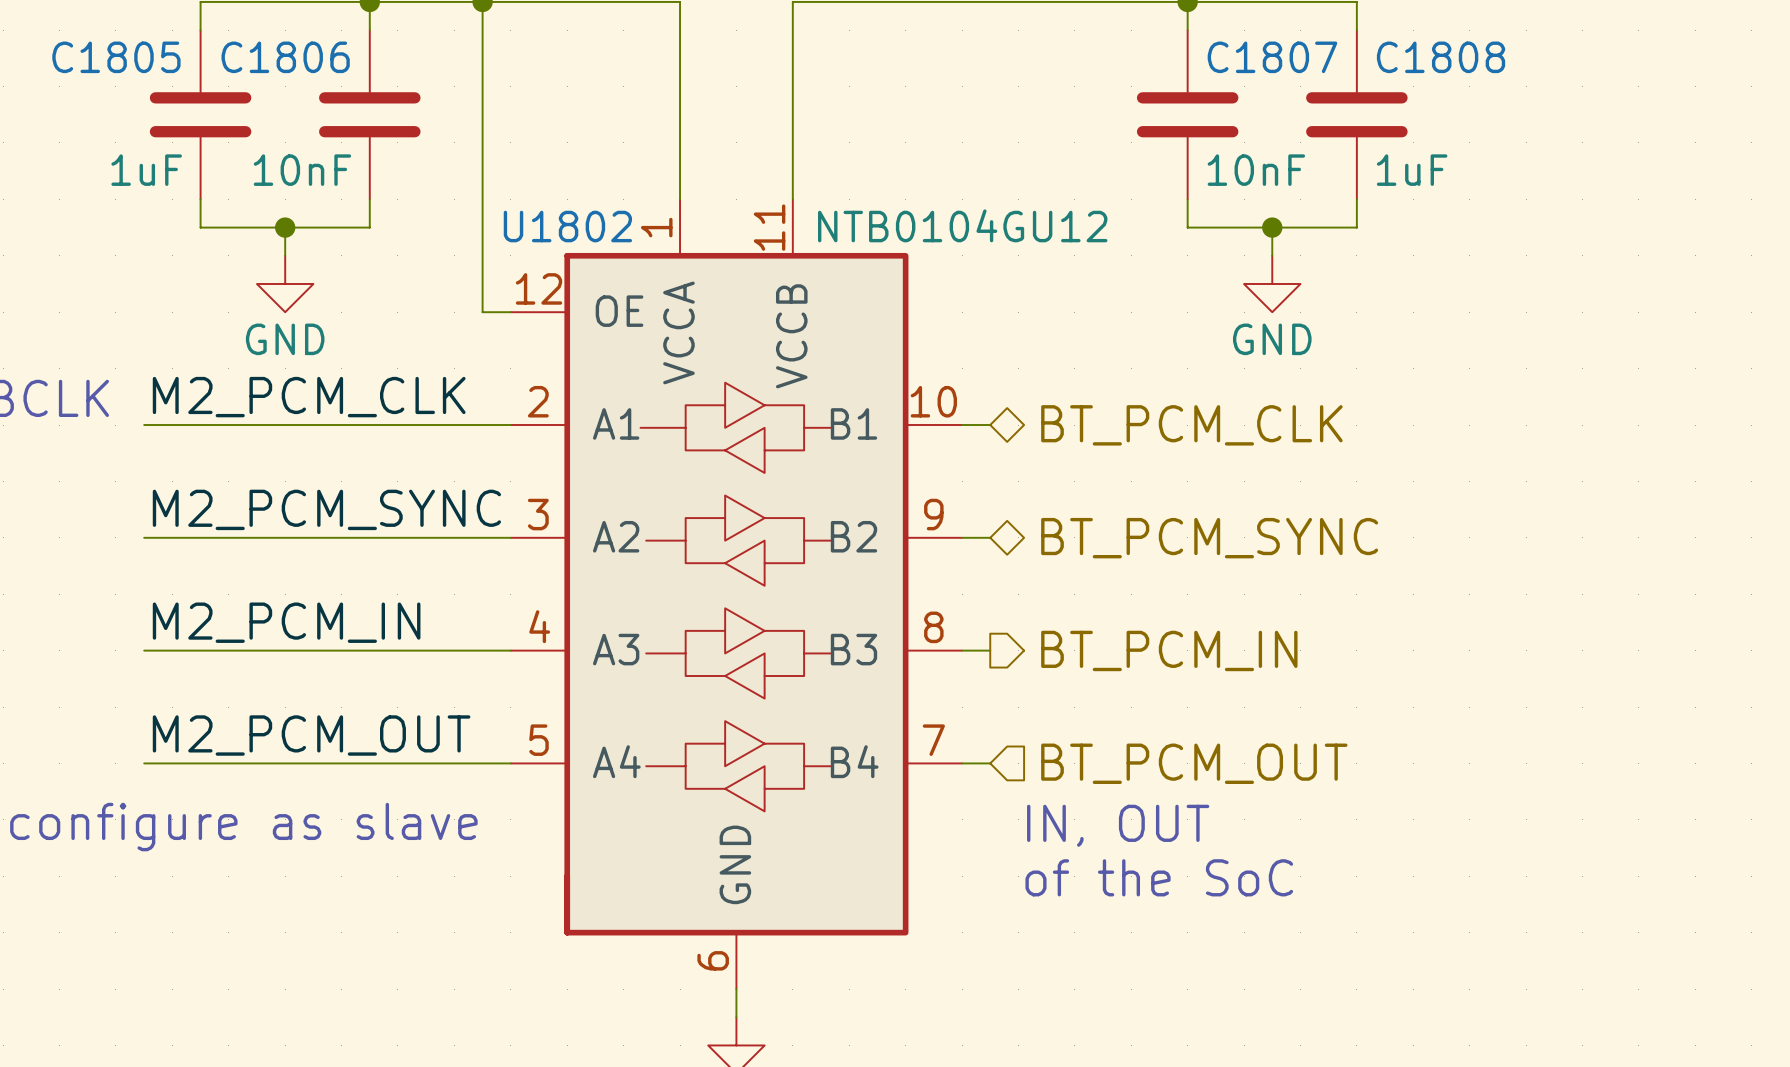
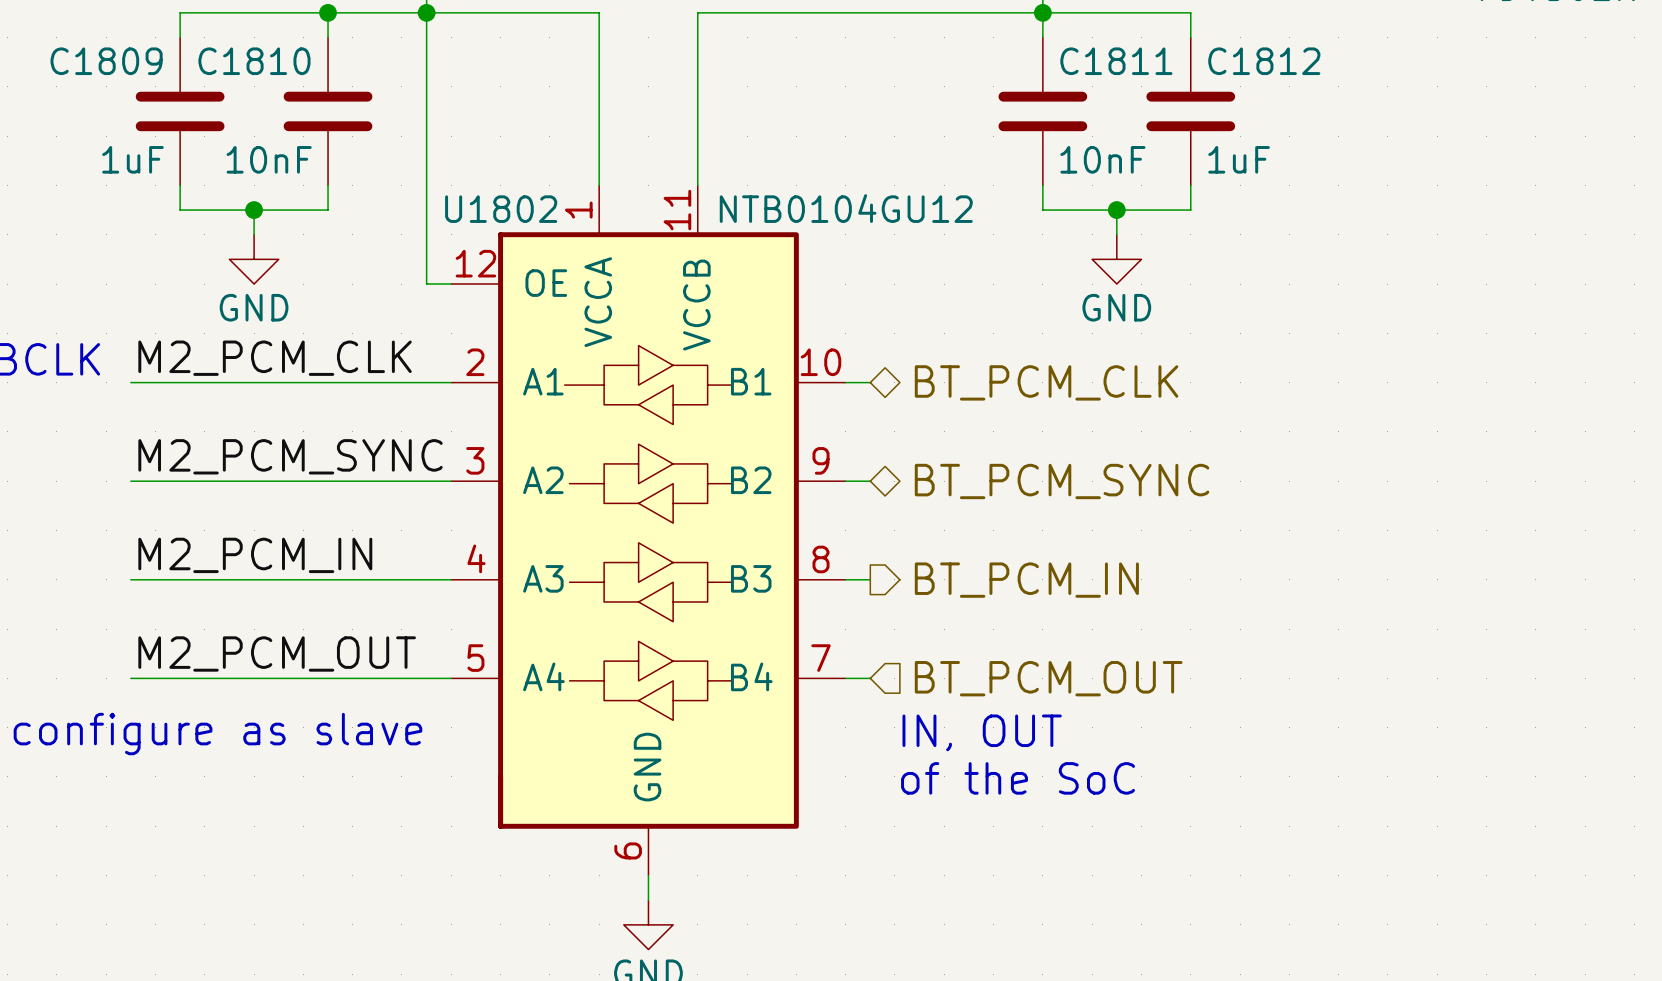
C1805 name: C1805 (116, 57) -> C1809 (106, 61)
C1806 name: C1806 (285, 57) -> C1810 (254, 61)
C1807 name: C1807 (1272, 57) -> C1811 (1116, 61)
C1808 name: C1808 (1441, 57) -> C1812 (1264, 61)

